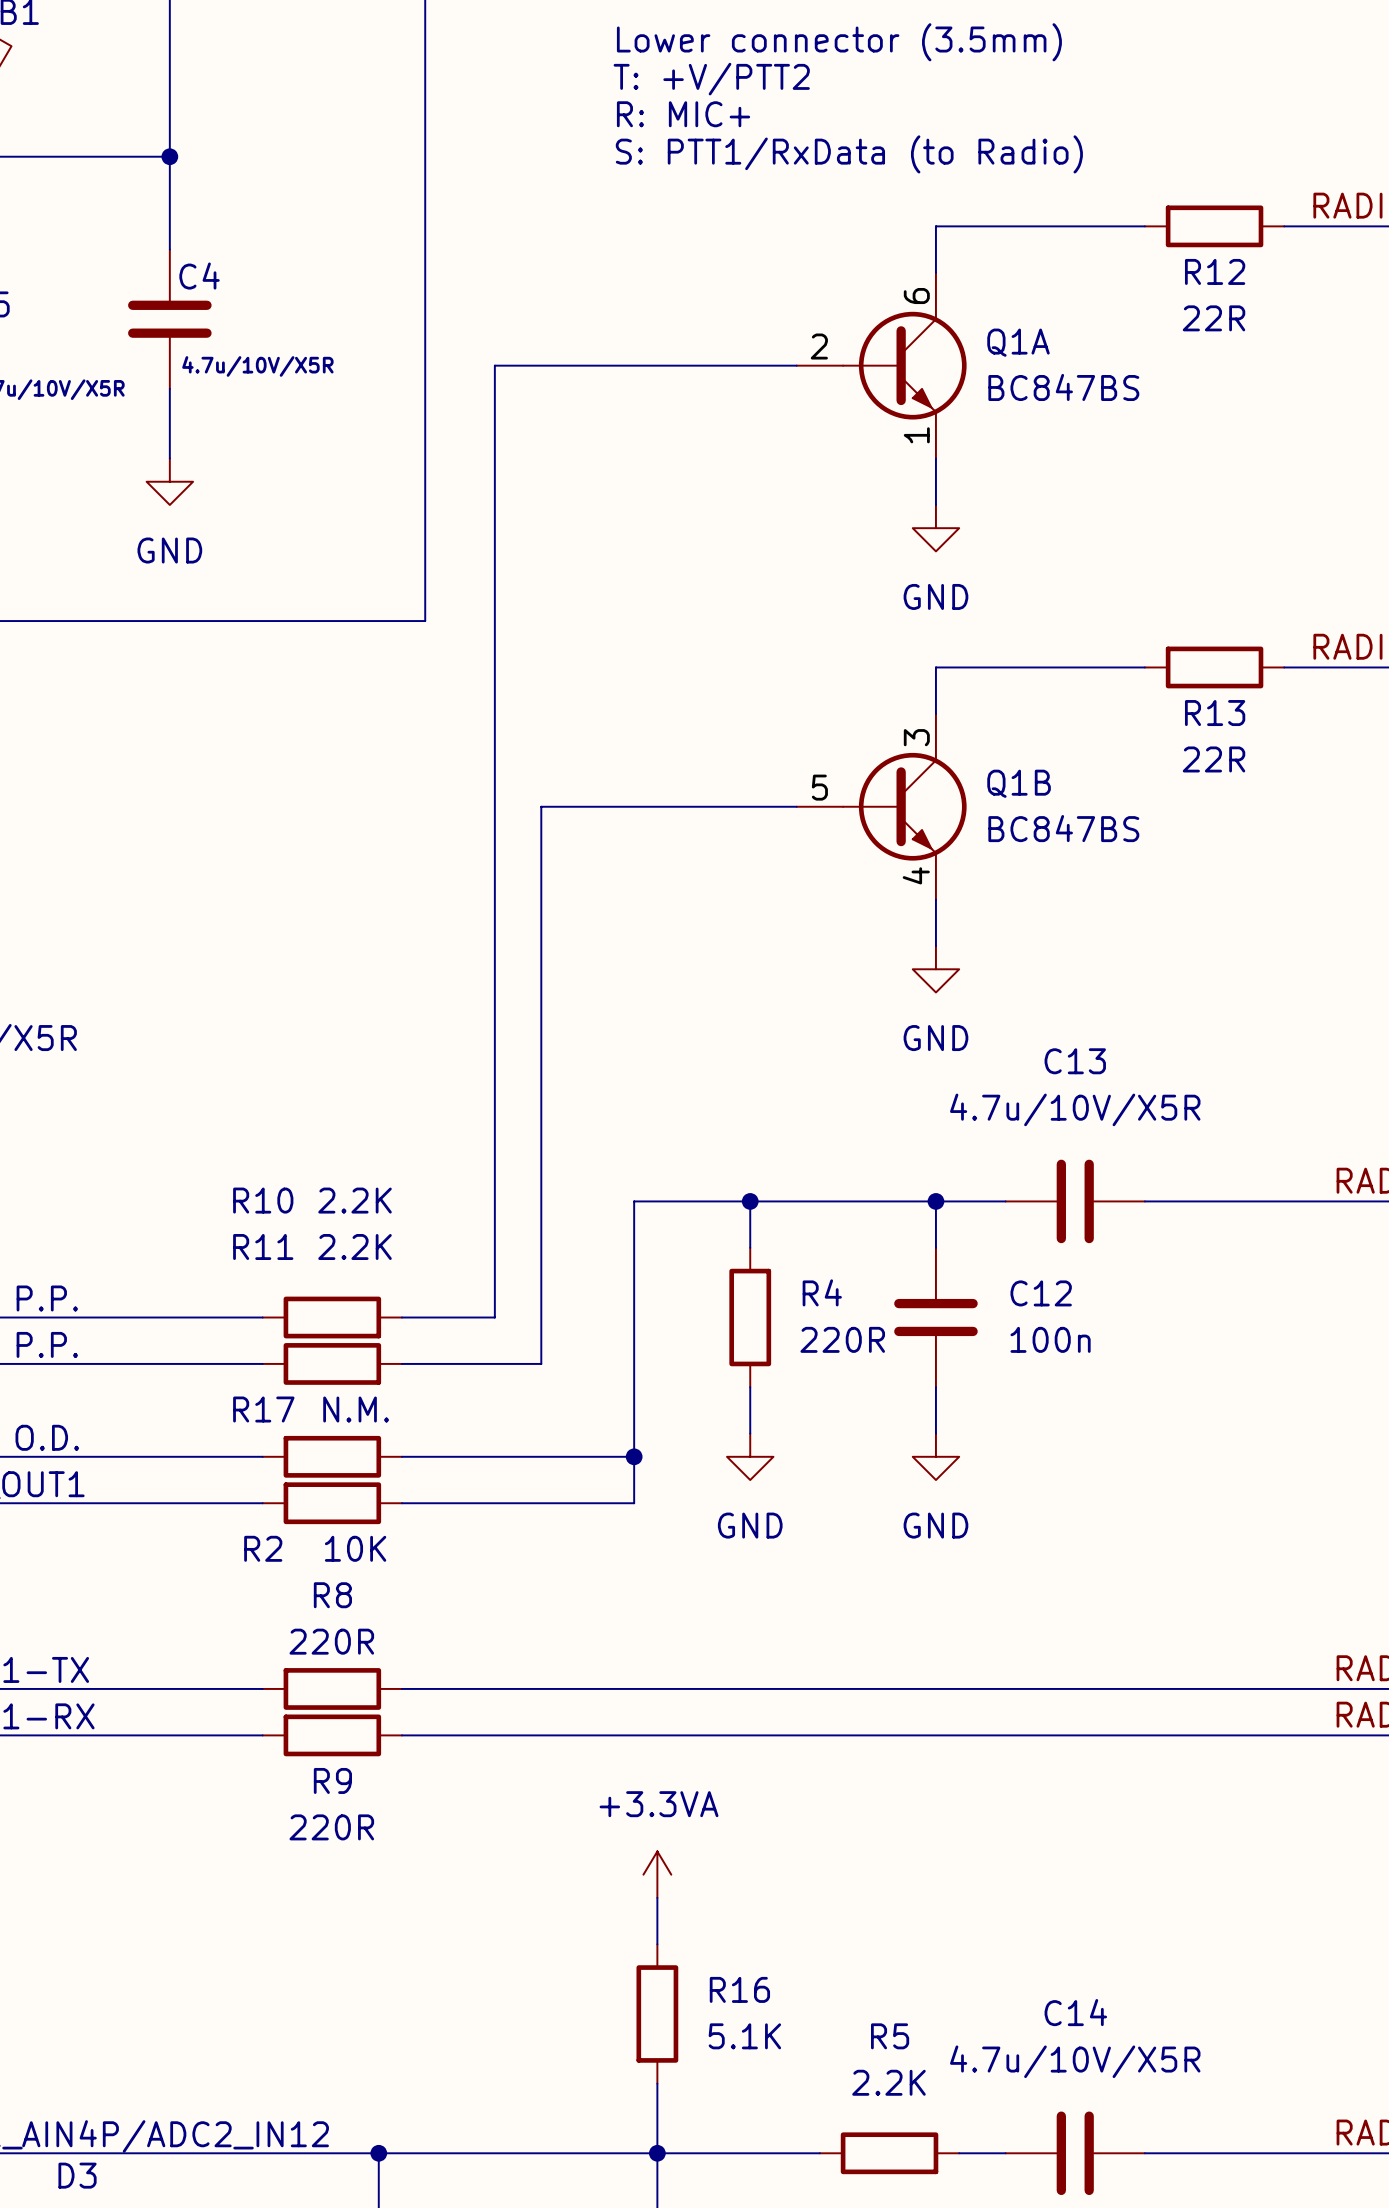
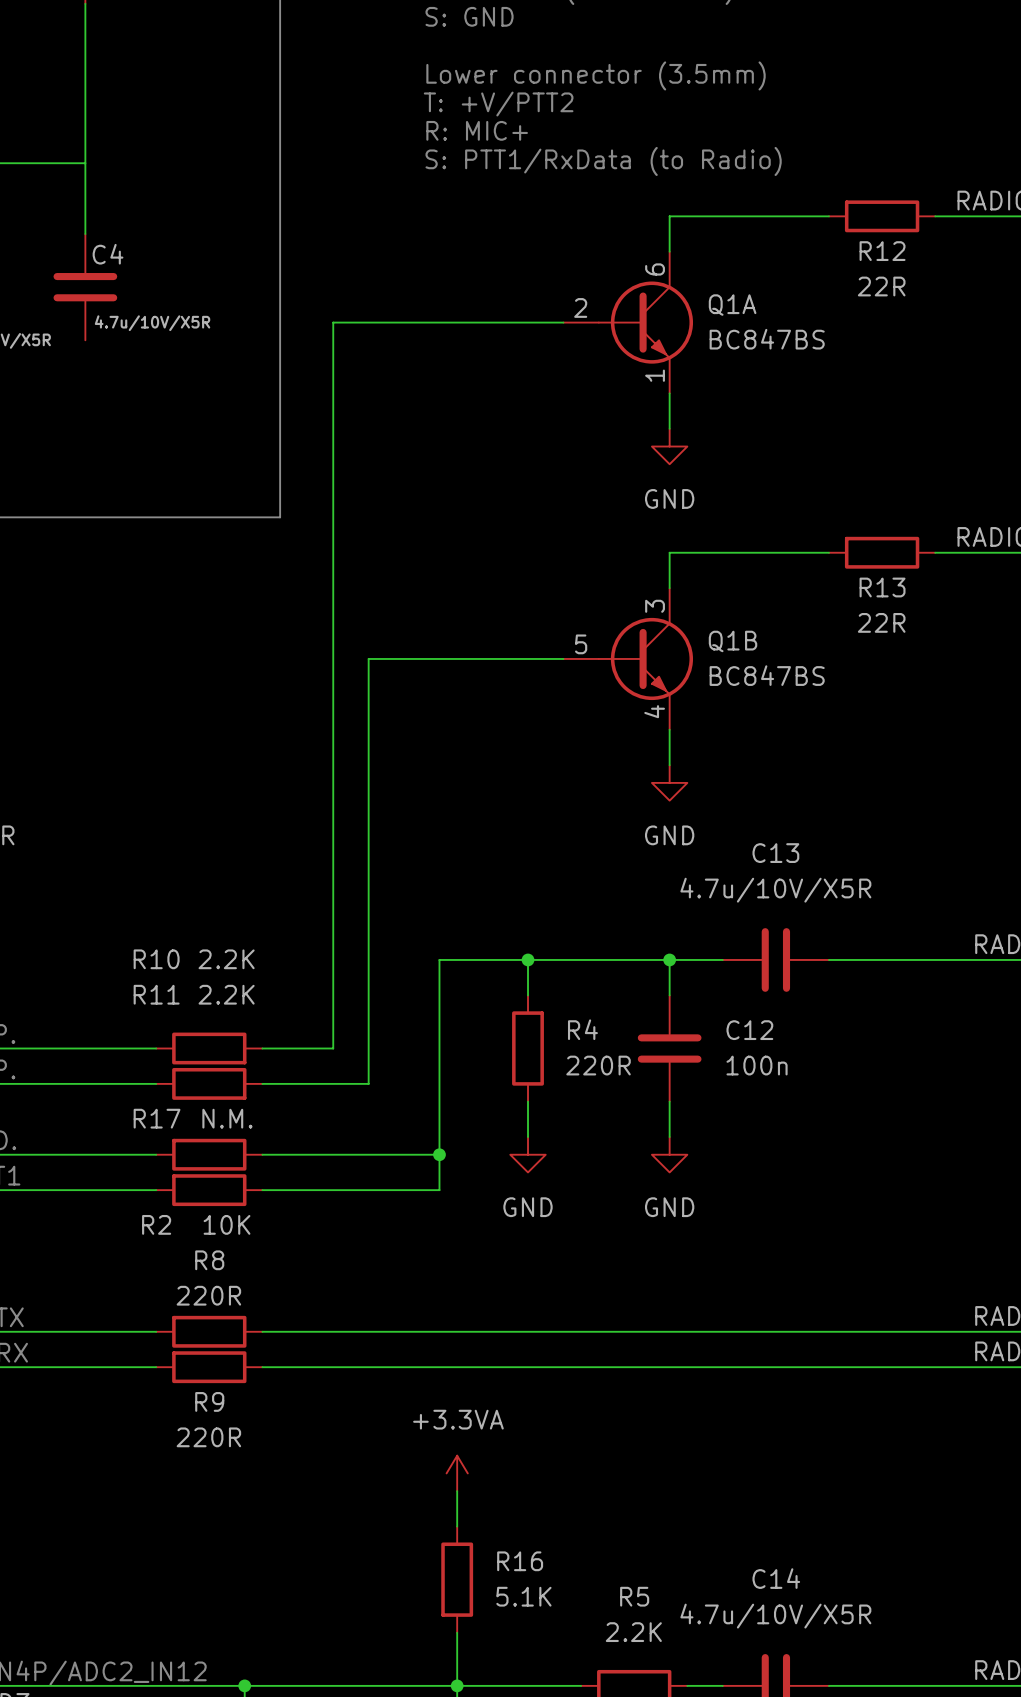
junction: (169, 156) -> none
wire: (169, 388) (169, 458) -> none
power symbol: GND (169, 481) -> none

